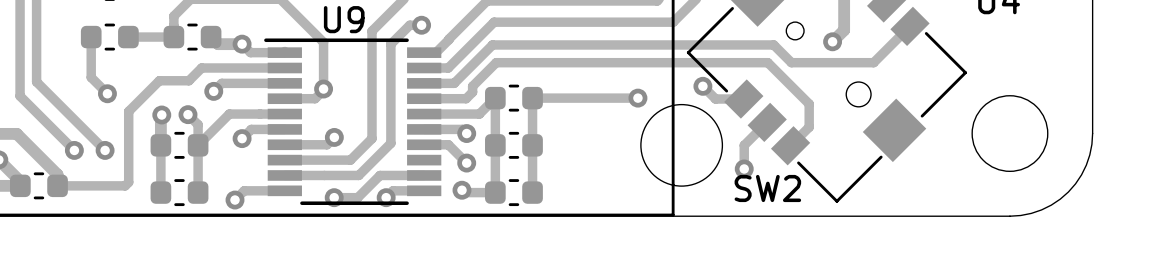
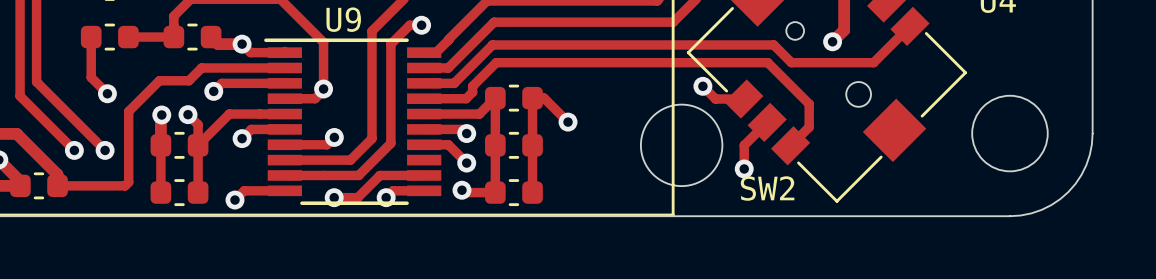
track: (544, 98) (637, 98) -> (544, 98) (568, 122)
via position: (637, 98) -> (568, 122)

